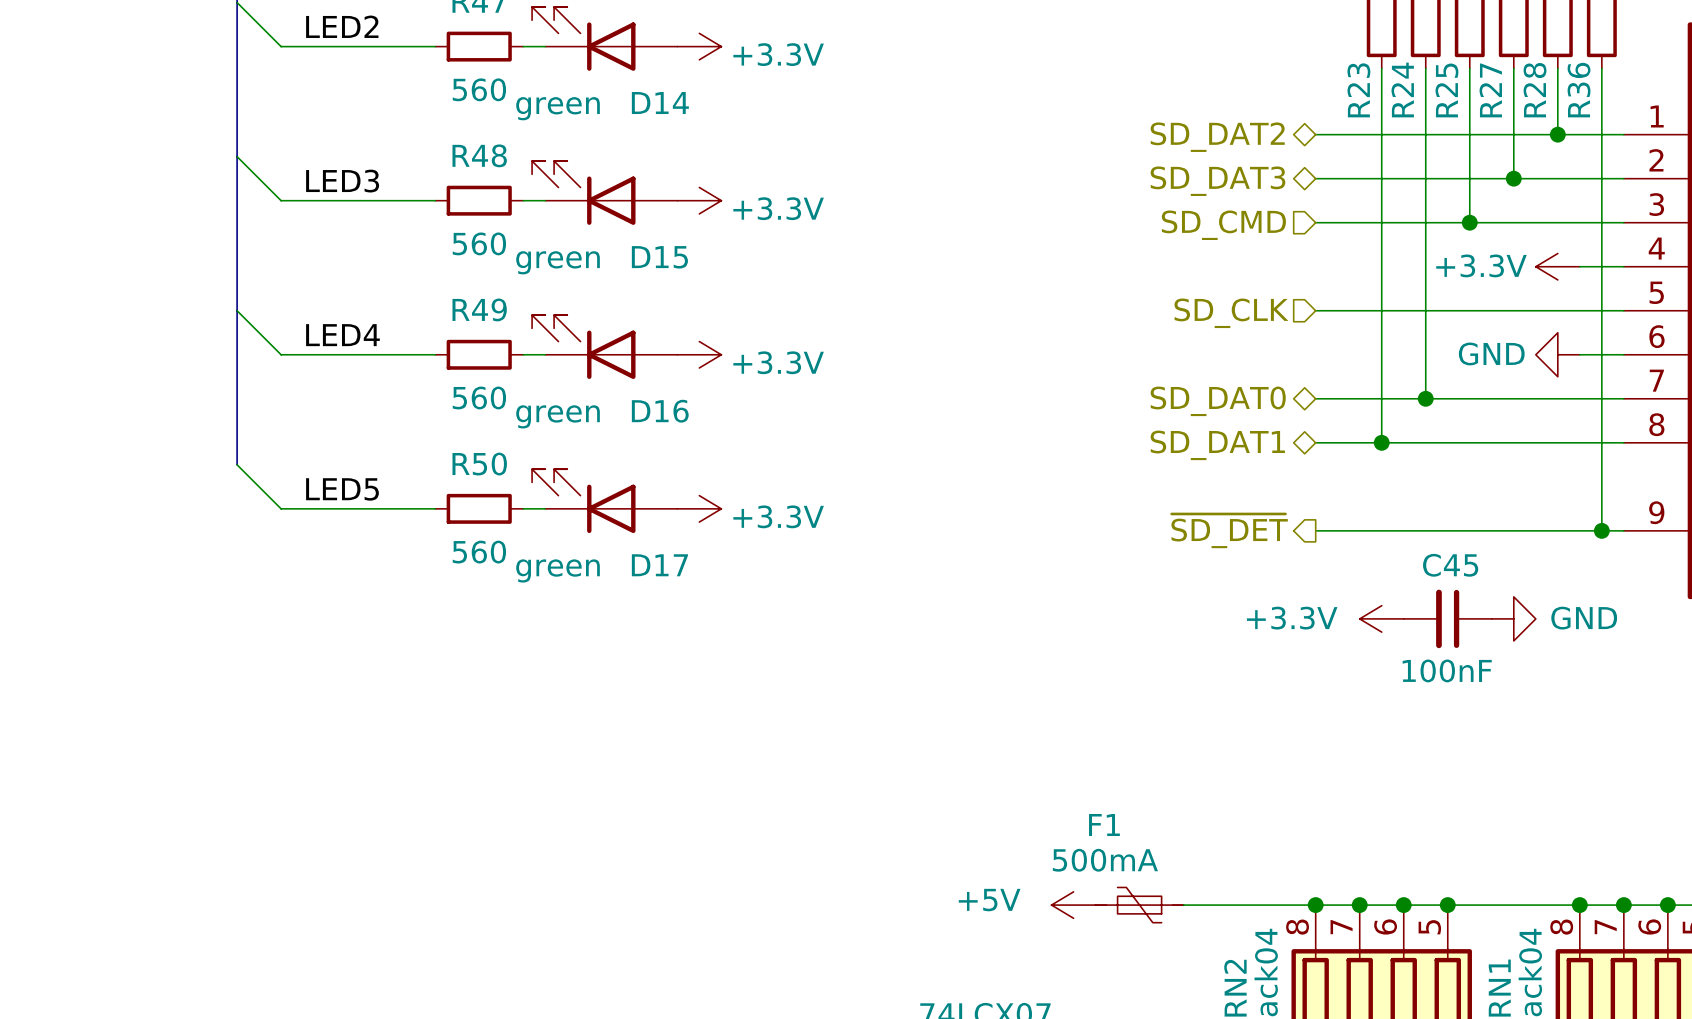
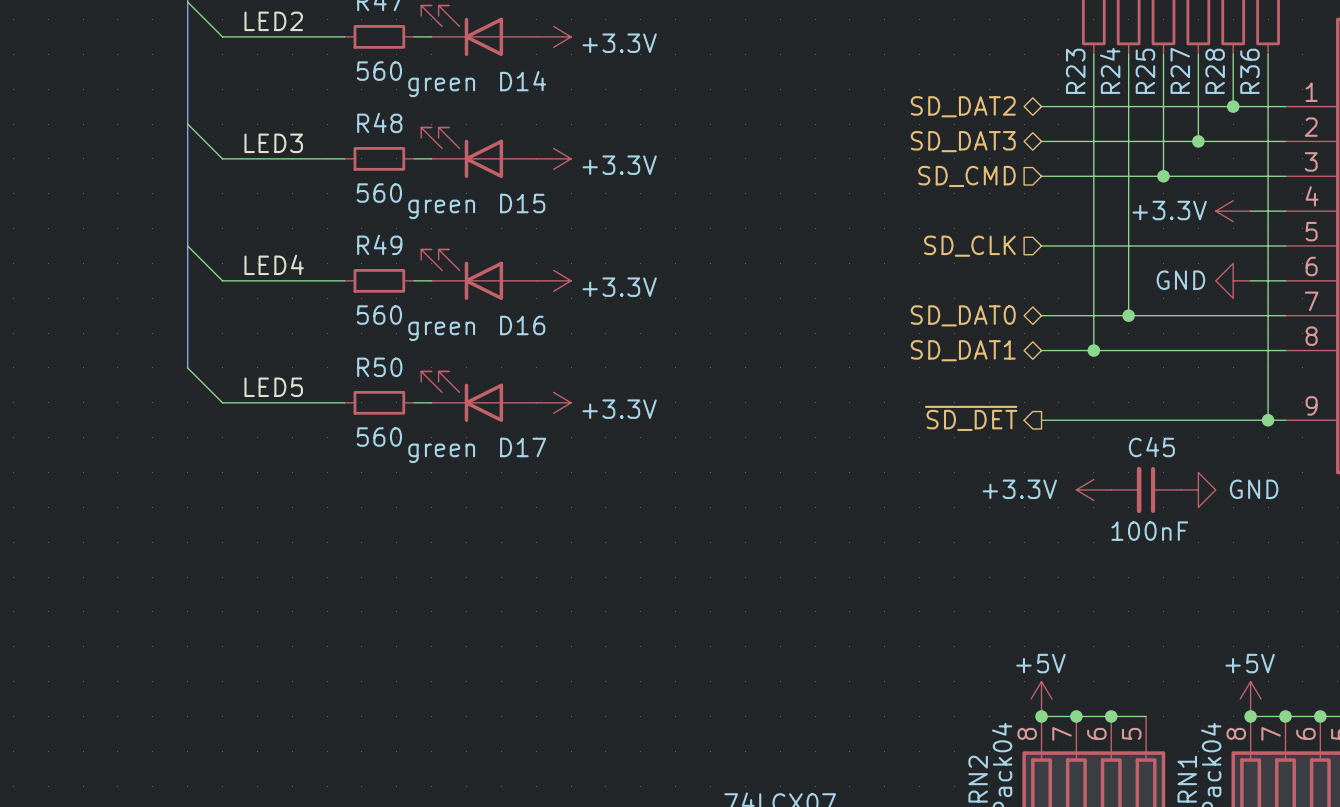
power symbol: none -> +5V (1250, 699)
power symbol text position: +5V (989, 900) -> +5V (1040, 663)
power symbol rotation: 0° (1073, 905) -> 90° clockwise (1041, 699)
power symbol position: +5V (1073, 905) -> +5V (1041, 699)
F1: 500mA (1139, 905) -> none
wire: (1183, 905) (1315, 905) -> none
wire: (1447, 905) (1579, 905) -> none
junction: (1447, 905) -> none

